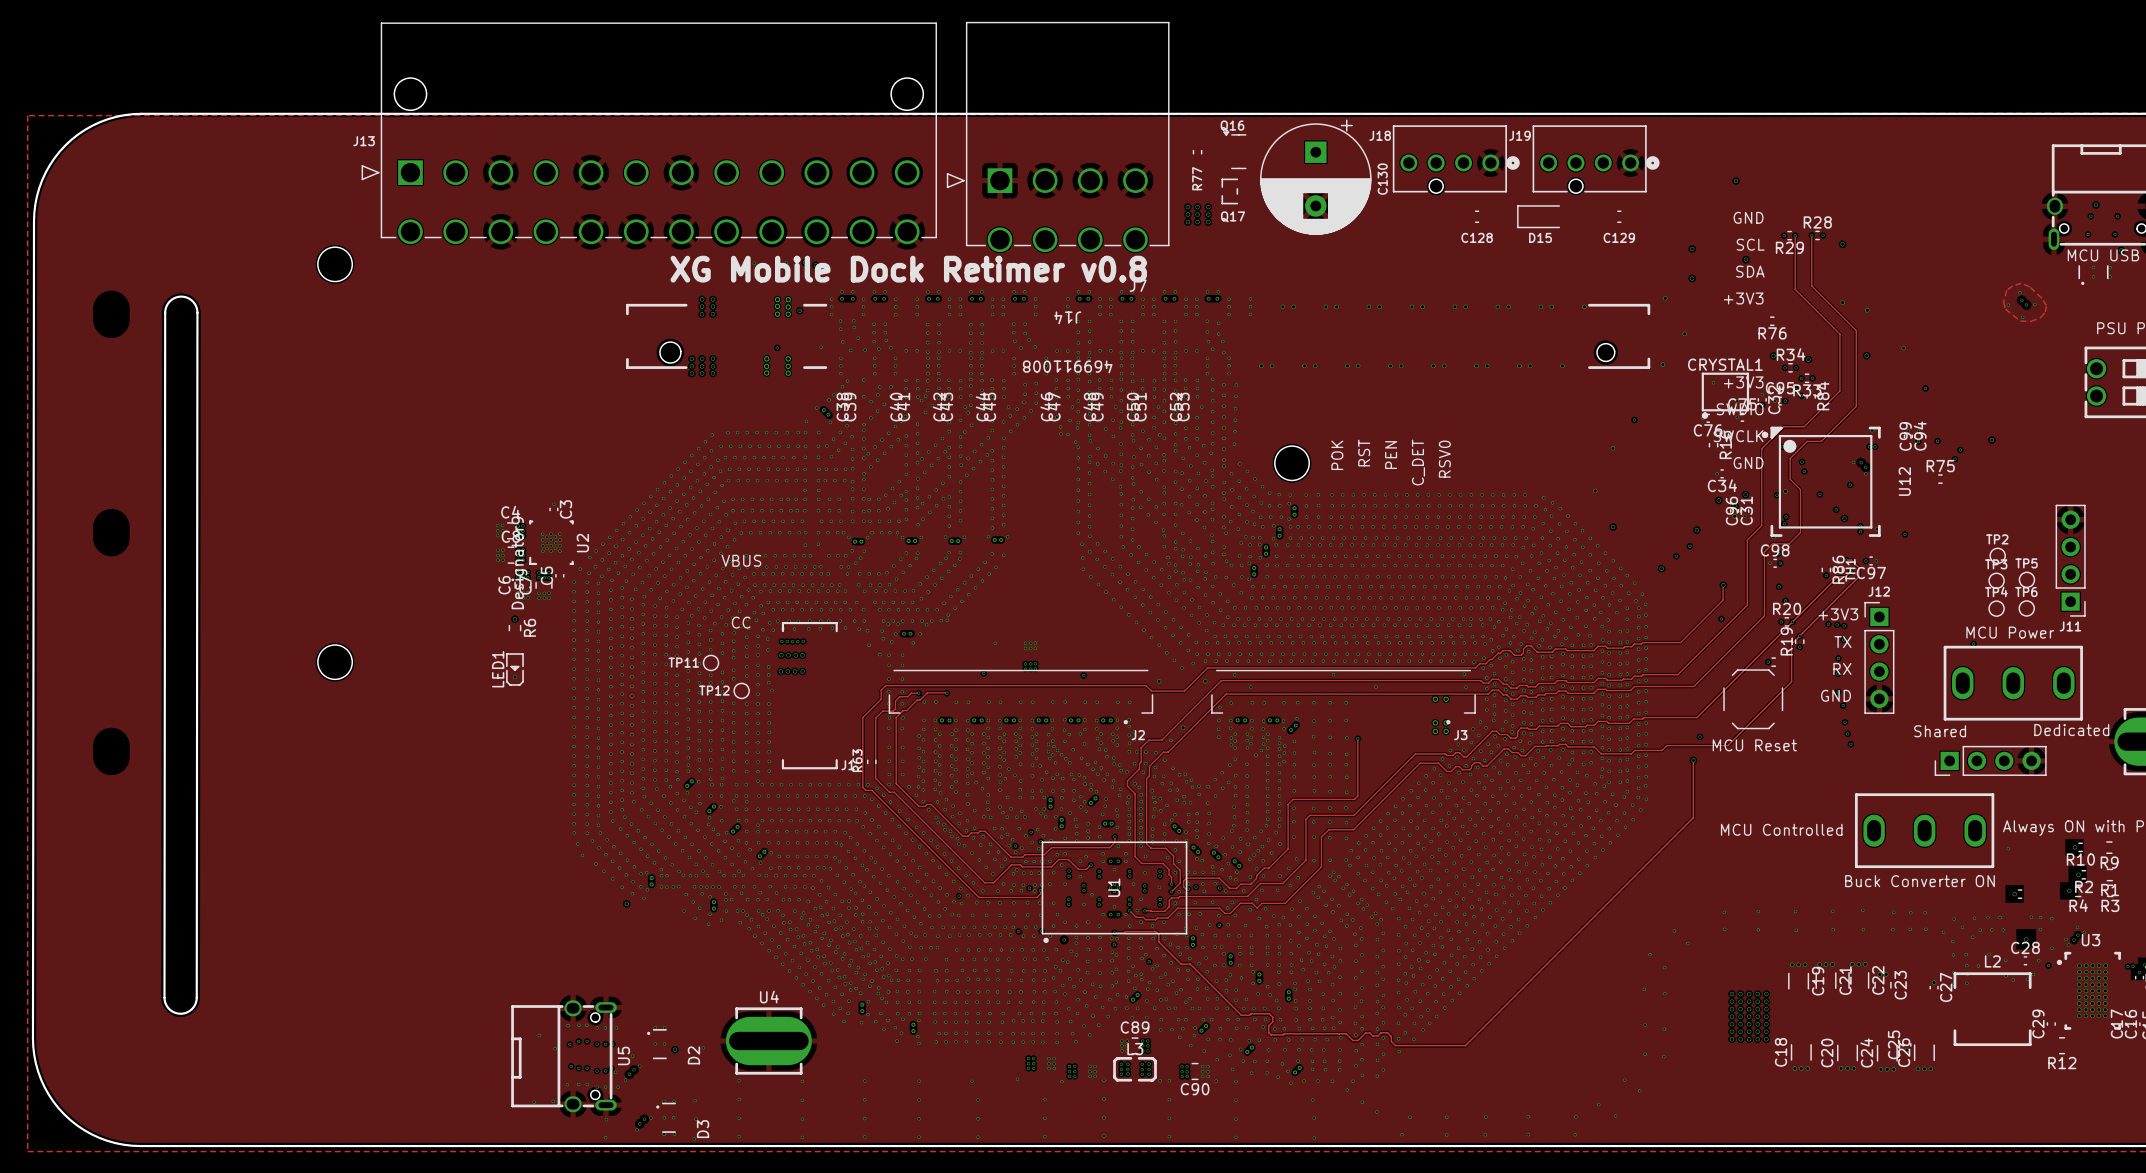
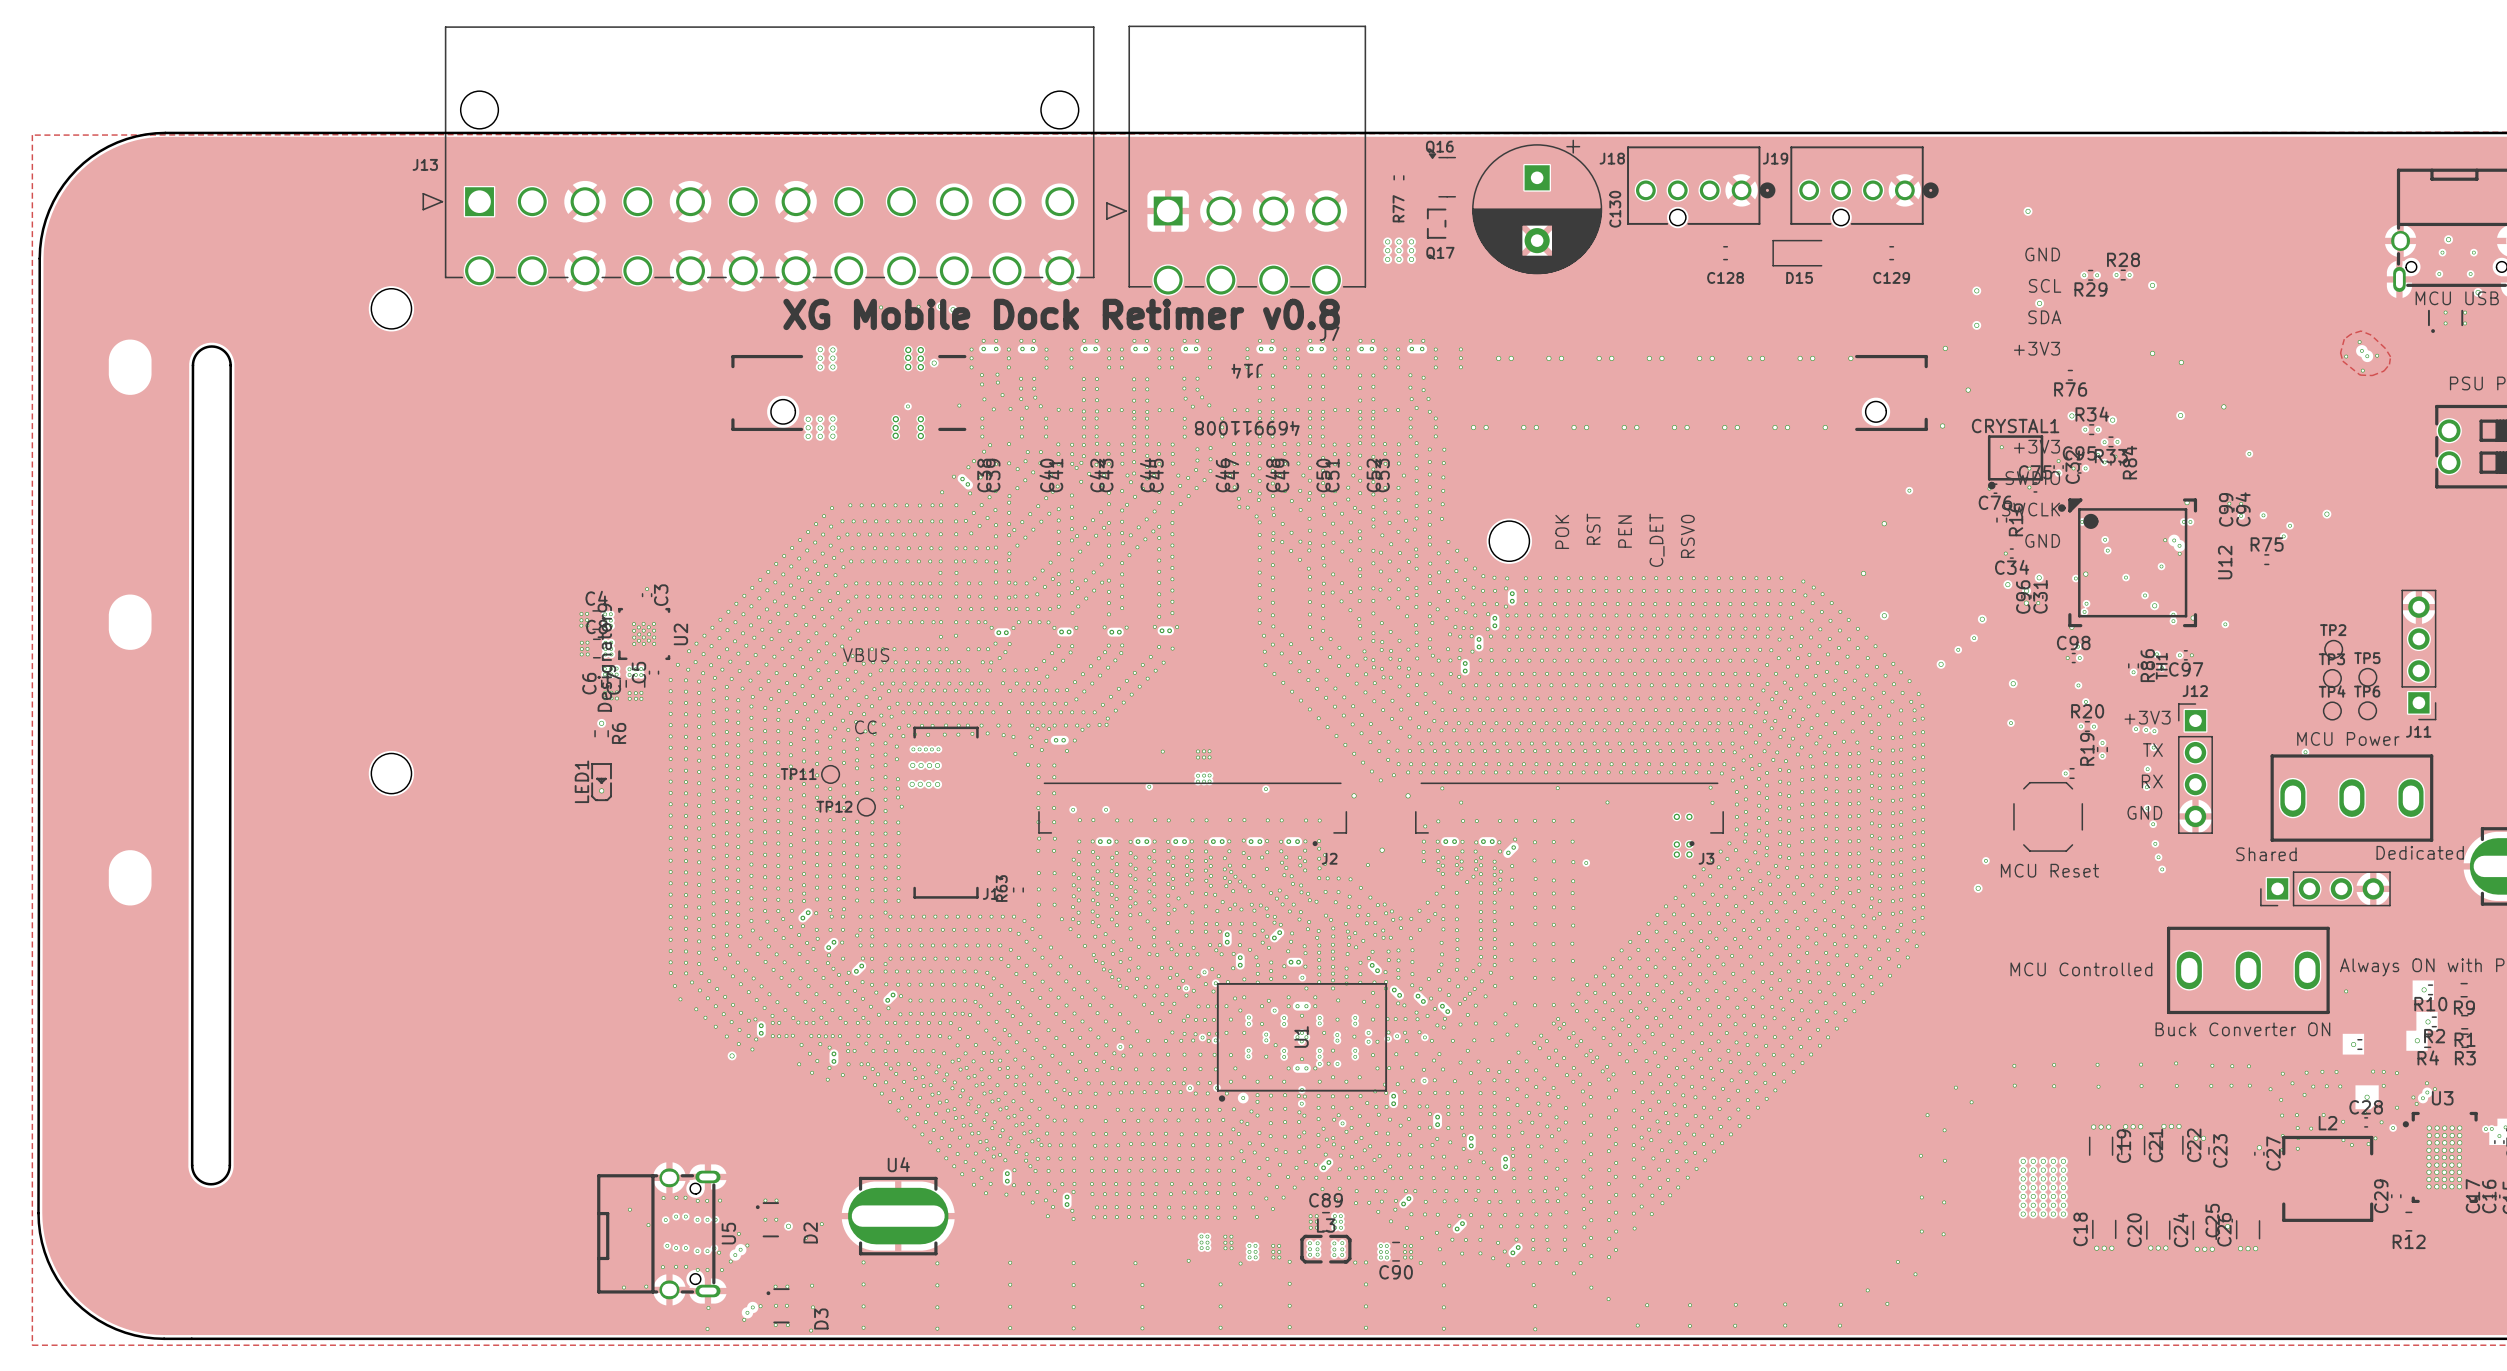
track: (1795, 235) (1795, 289) (1839, 334) (1839, 390) (1804, 426) (1783, 426) (1761, 448) (1761, 525) (1747, 539) (1747, 605) (1677, 674) (1643, 674) (1622, 680) (1598, 678) (1594, 682) (1557, 680) (1554, 683) (1538, 683) (1535, 686) (1519, 685) (1516, 688) (1510, 688) (1498, 679) (1492, 679) (1488, 683) (1483, 683) (1480, 680) (1221, 680) (1161, 740) (1148, 740) (1141, 747) (1139, 768) (1127, 780) (1127, 786) (1135, 793) (1135, 856) (1141, 863) (1162, 863) (1169, 869) (1171, 884) -> none
track: (1811, 235) (1811, 286) (1856, 330) (1856, 406) (1821, 441) (1807, 441) (1790, 458) (1790, 479) (1800, 489) (1800, 532) (1789, 543) (1772, 543) (1764, 552) (1764, 615) (1693, 686) (1634, 686) (1630, 690) (1597, 689) (1593, 693) (1568, 693) (1565, 691) (1558, 691) (1556, 693) (1538, 694) (1535, 697) (1520, 695) (1517, 699) (1511, 699) (1498, 690) (1492, 690) (1488, 694) (1226, 694) (1168, 752) (1163, 752) (1149, 766) (1149, 775) (1146, 778) (1146, 843) (1151, 848) (1165, 848) (1173, 856) (1173, 863) (1180, 870) (1180, 883) (1171, 891) -> none
track: (1846, 560) (1851, 560) (1858, 567) (1858, 576) (1791, 644) (1791, 681) (1727, 745) (1666, 745) (1661, 750) (1634, 750) (1631, 753) (1601, 753) (1594, 746) (1568, 746) (1565, 744) (1559, 744) (1534, 746) (1525, 755) (1504, 748) (1486, 766) (1474, 762) (1469, 769) (1462, 769) (1456, 766) (1451, 771) (1446, 771) (1438, 763) (1419, 763) (1353, 829) (1328, 829) (1321, 837) (1321, 866) (1285, 903) (1261, 903) (1257, 908) (1252, 903) (1240, 903) (1230, 913) (1224, 913) (1219, 908) (1177, 908) (1167, 918) (1155, 919) (1136, 917) (1129, 910) -> none
track: (1850, 571) (1845, 576) (1837, 576) (1696, 717) (1644, 717) (1633, 719) (1629, 723) (1598, 721) (1594, 725) (1585, 726) (1571, 726) (1567, 723) (1560, 723) (1557, 726) (1539, 726) (1536, 729) (1520, 728) (1515, 738) (1492, 731) (1466, 756) (1459, 752) (1452, 755) (1415, 753) (1353, 815) (1309, 815) (1305, 819) (1305, 860) (1282, 883) (1260, 883) (1247, 896) (1171, 897) (1169, 900) (1169, 906) (1164, 911) (1144, 910) -> none
track: (1723, 585) (1723, 600) (1680, 642) (1642, 642) (1623, 648) (1598, 646) (1593, 650) (1555, 648) (1552, 652) (1537, 652) (1530, 645) (1526, 645) (1521, 655) (1514, 655) (1509, 650) (1503, 650) (1485, 663) (1479, 663) (1475, 667) (1207, 667) (1184, 691) (1151, 691) (1145, 685) (885, 685) (881, 690) (881, 699) (862, 717) (862, 787) (865, 790) (871, 790) (978, 897) (1036, 897) (1040, 890) -> none
track: (918, 693) (899, 696) (895, 701) (895, 708) (893, 711) (882, 711) (875, 718) (875, 778) (889, 792) (894, 792) (984, 882) (993, 882) (1011, 864) (1051, 866) (1058, 859) (1068, 859) (1078, 869) (1086, 869) (1091, 865) -> none
track: (946, 693) (927, 692) (896, 717) (896, 783) (919, 806) (931, 804) (962, 836) (985, 831) (1011, 857) (1044, 854) (1051, 847) (1109, 847) (1114, 842) (1114, 836) -> none
track: (1357, 738) (1357, 796) (1354, 799) (1293, 799) (1288, 804) (1288, 849) (1268, 868) (1264, 868) (1250, 884) (1240, 884) (1236, 888) (1229, 888) (1219, 878) (1186, 878) (1183, 880) (1183, 886) (1188, 889) -> none
track: (1693, 760) (1693, 817) (1465, 1045) (1395, 1045) (1387, 1032) (1381, 1032) (1377, 1035) (1365, 1033) (1358, 1040) (1352, 1040) (1346, 1033) (1342, 1033) -> none
track: (1114, 932) (1155, 931) (1158, 934) (1158, 941) (1181, 964) (1190, 964) (1241, 1015) (1269, 1013) (1272, 1017) (1272, 1021) (1268, 1025) (1268, 1032) (1270, 1034) (1339, 1033) -> none
track: (1339, 1033) (1342, 1033) -> none

